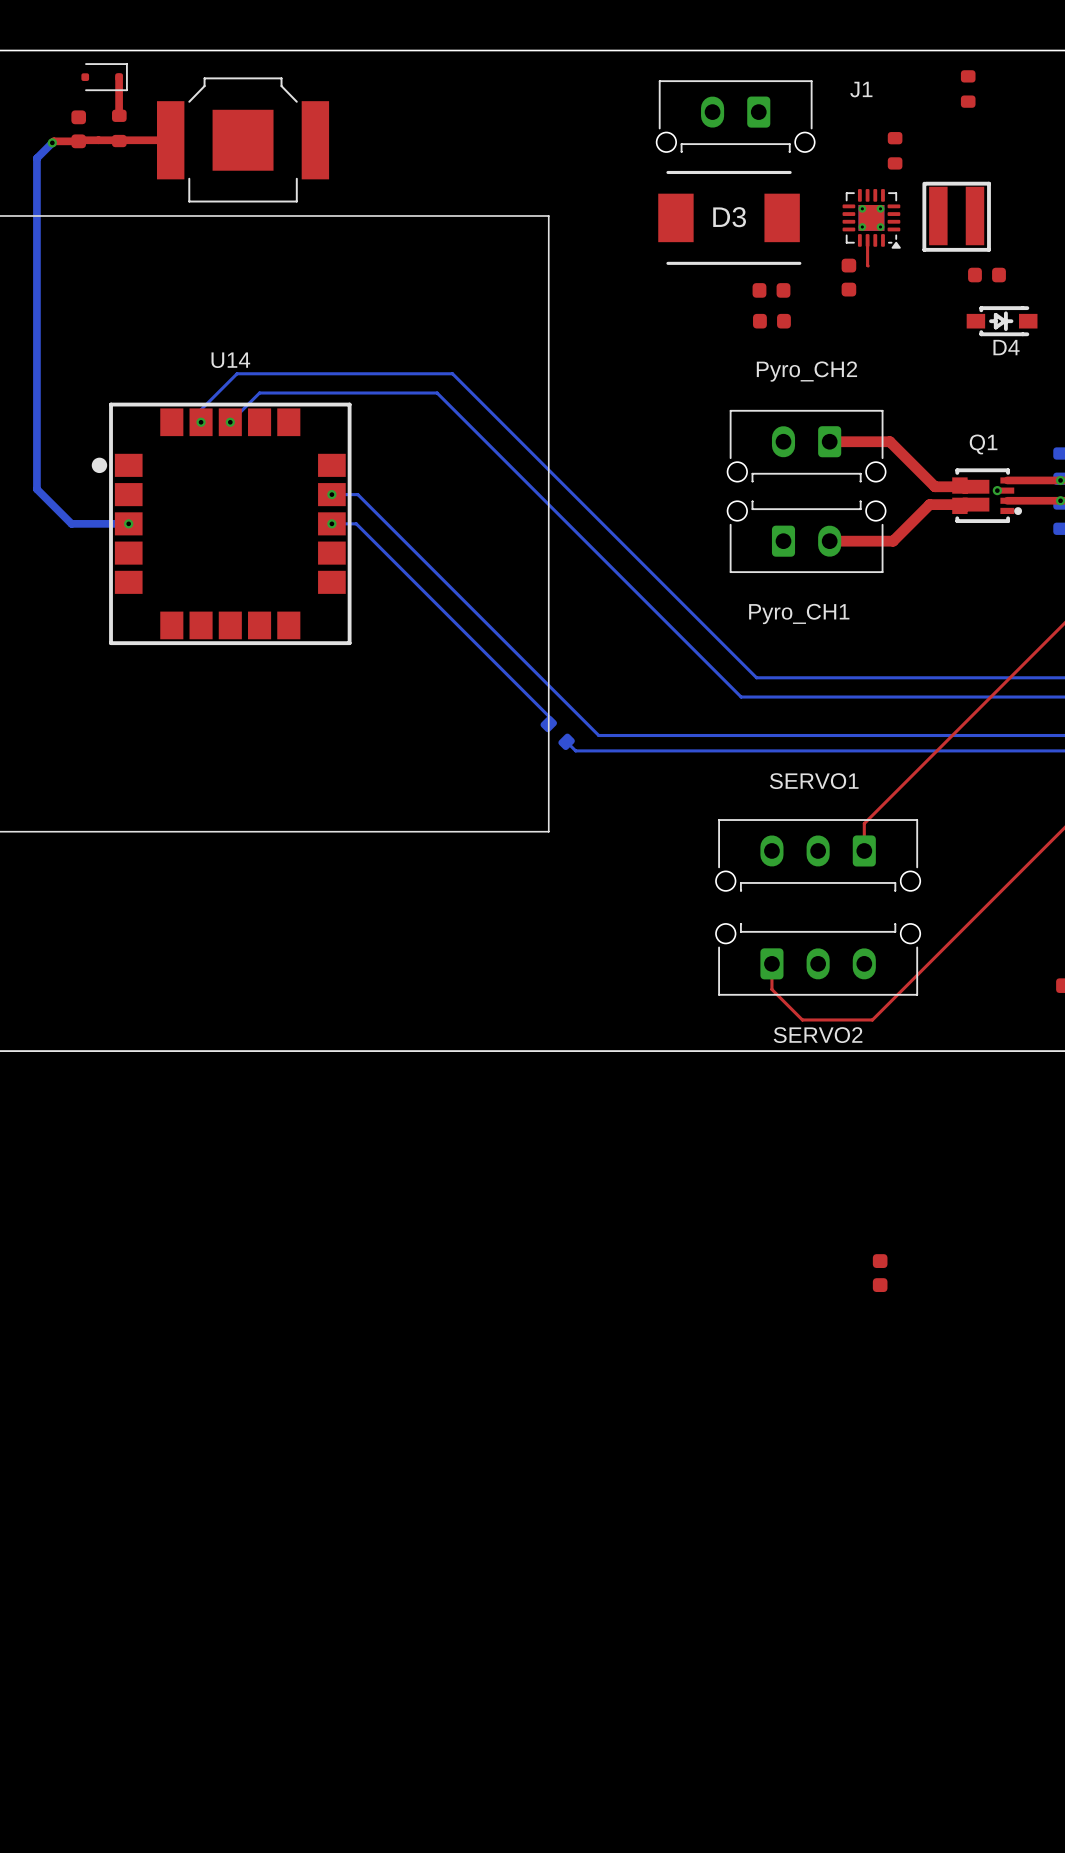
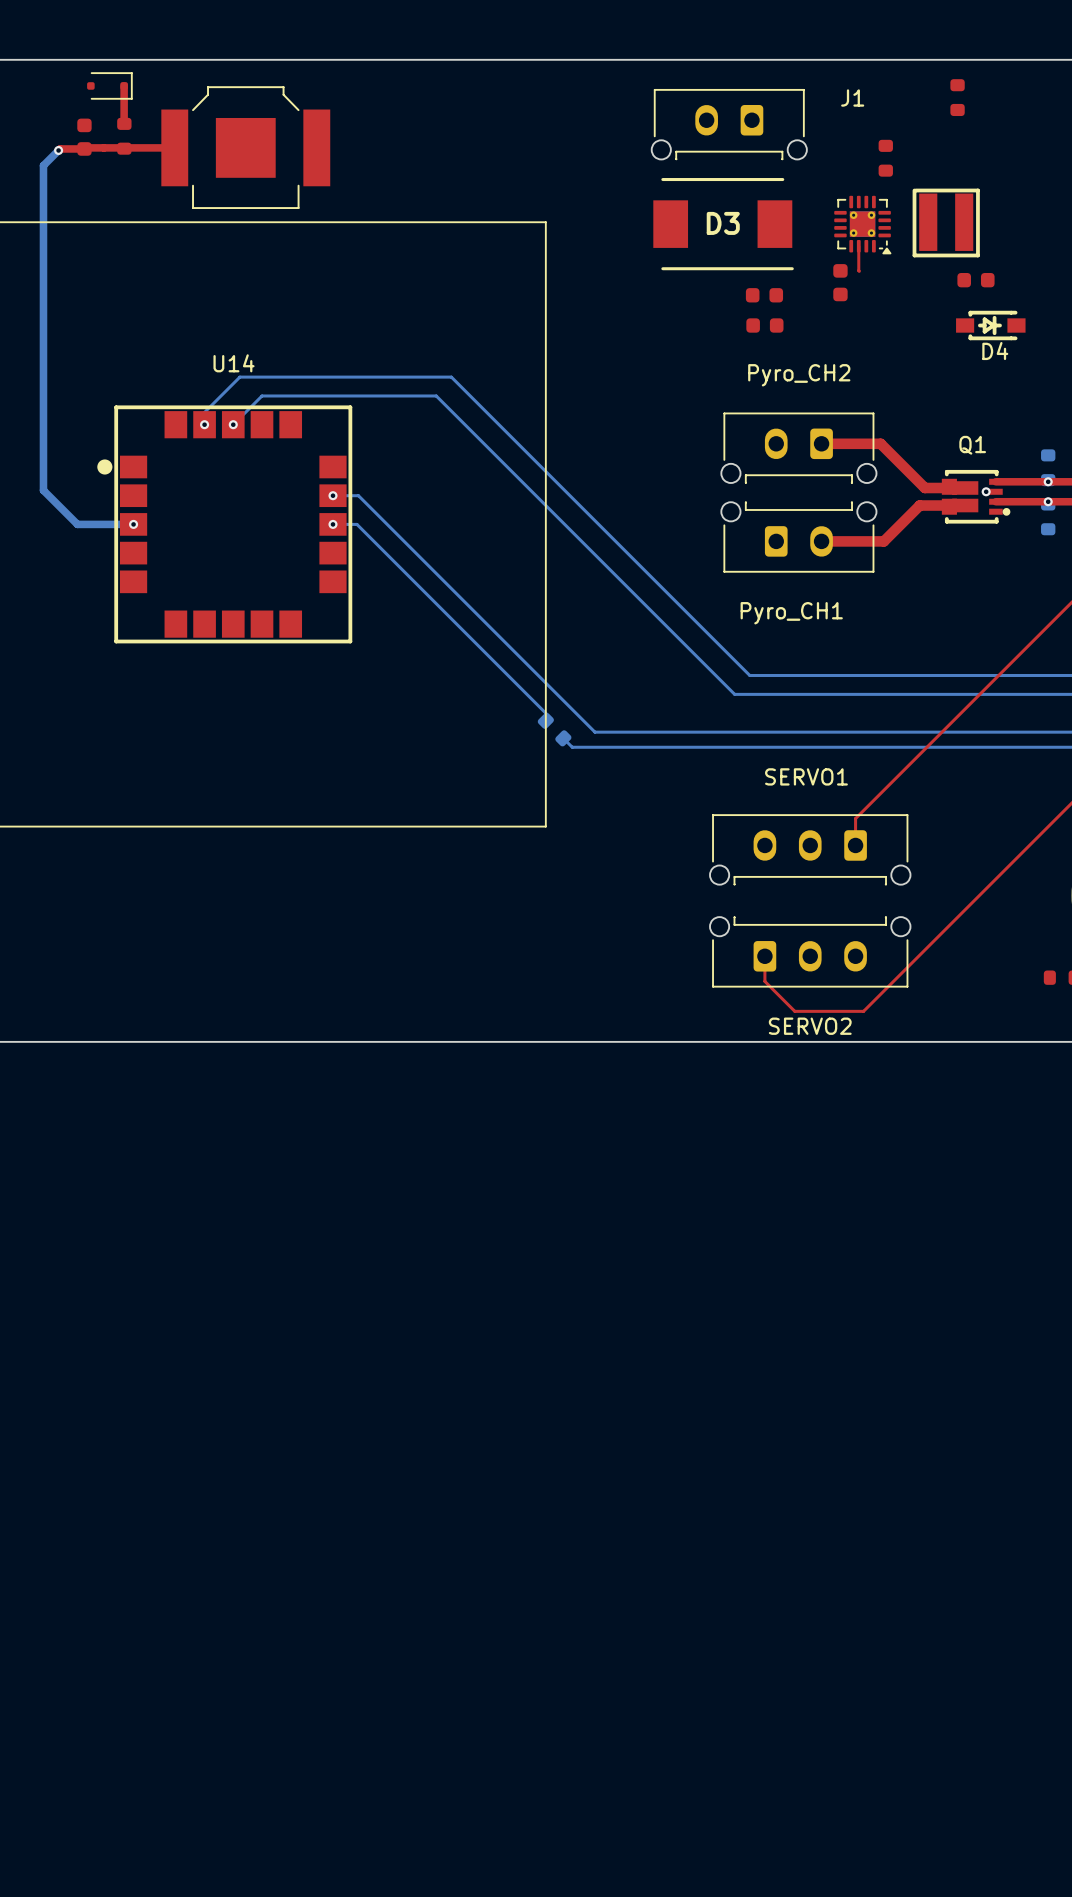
part: (880, 1273) -> none

